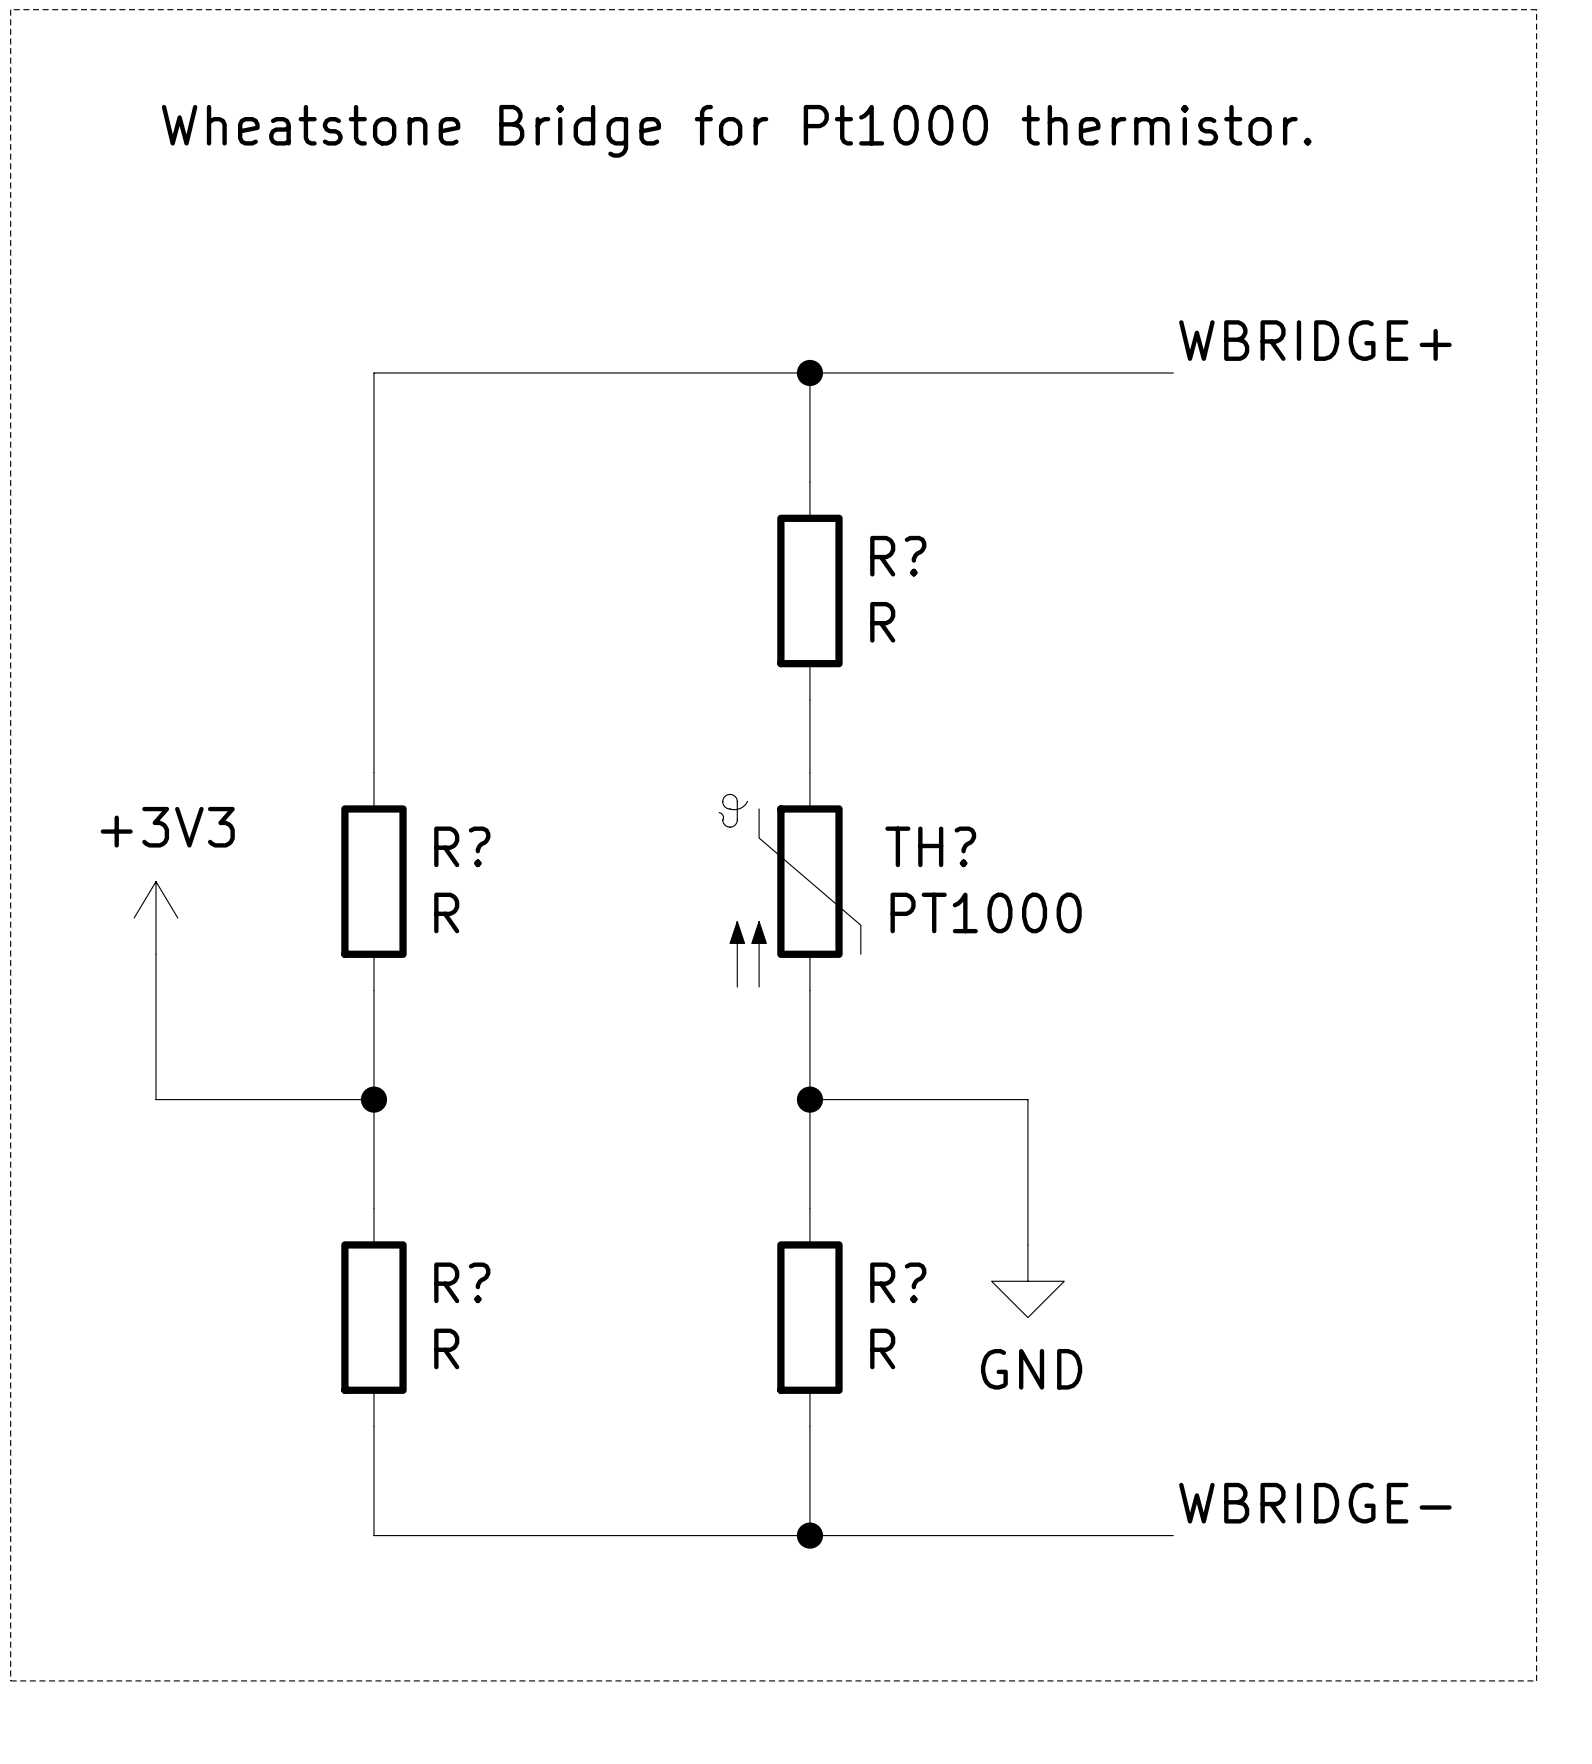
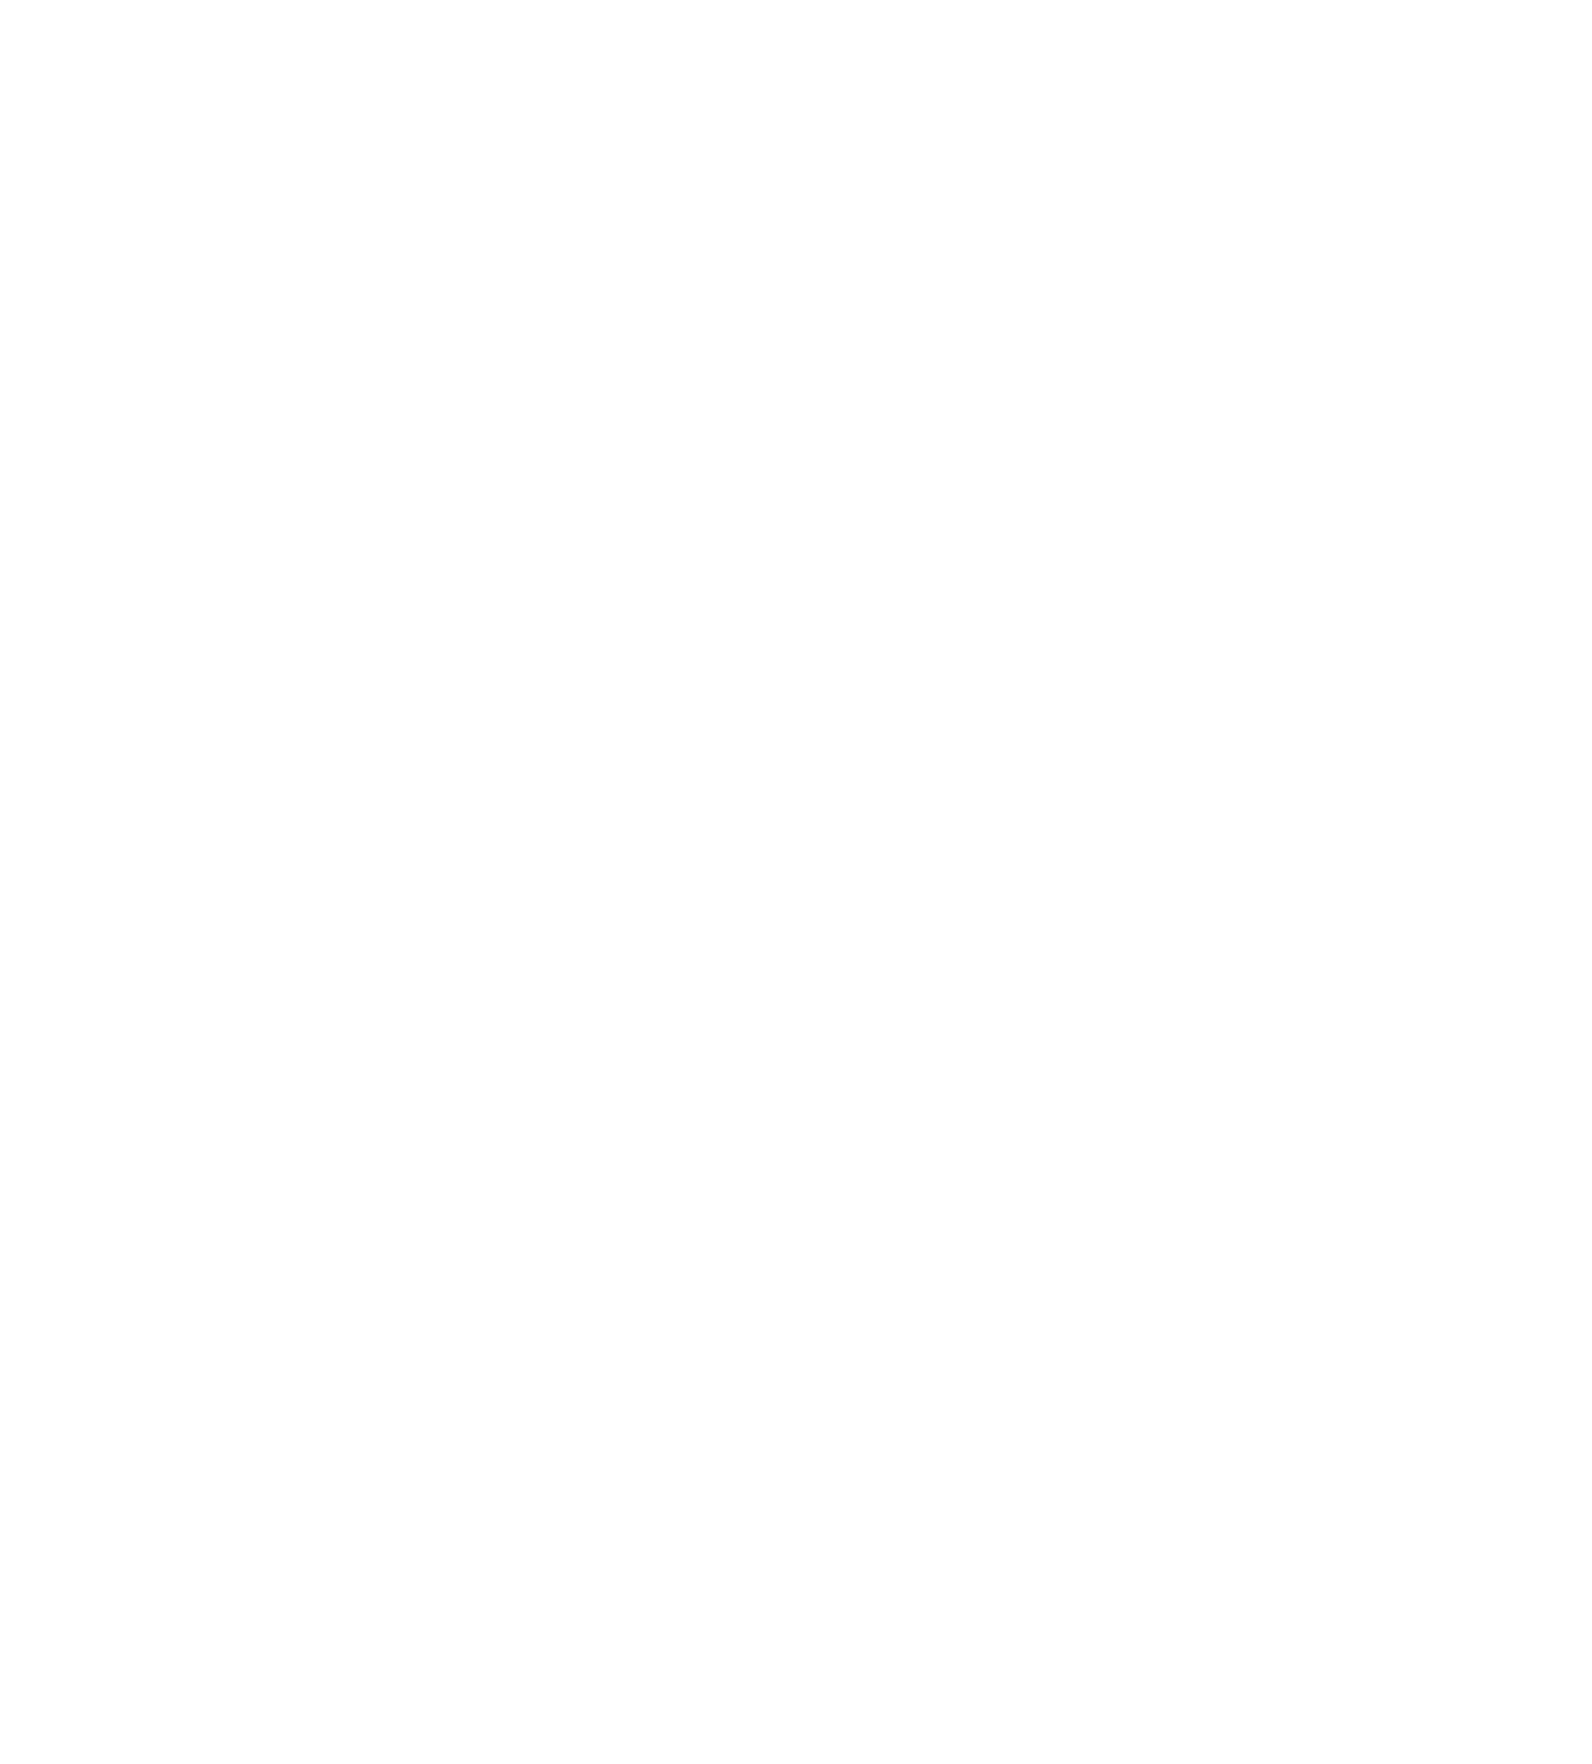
line: (10, 9) (1536, 9) (1536, 1680) (10, 1680) (10, 9) -> none
text: Wheatstone Bridge for Pt1000 thermistor. (736, 131) -> none
label: WBRIDGE+ (1315, 340) -> none
wire: (809, 372) (809, 481) -> none
junction: (809, 372) -> none
wire: (1173, 372) (373, 372) (373, 772) -> none
R?: R (809, 590) -> none
wire: (809, 699) (809, 772) -> none
R?: R (373, 881) -> none
TH?: PT1000 (789, 881) -> none
power symbol: +3V3 (155, 917) -> none
wire: (155, 954) (155, 1099) (373, 1099) -> none
wire: (373, 990) (373, 1208) -> none
wire: (809, 990) (809, 1208) -> none
junction: (373, 1099) -> none
wire: (809, 1099) (1027, 1099) (1027, 1244) -> none
junction: (809, 1099) -> none
power symbol: GND (1027, 1281) -> none
R?: R (373, 1317) -> none
R?: R (809, 1317) -> none
wire: (373, 1426) (373, 1535) (1173, 1535) -> none
wire: (809, 1426) (809, 1535) -> none
label: WBRIDGE- (1315, 1503) -> none
junction: (809, 1535) -> none

